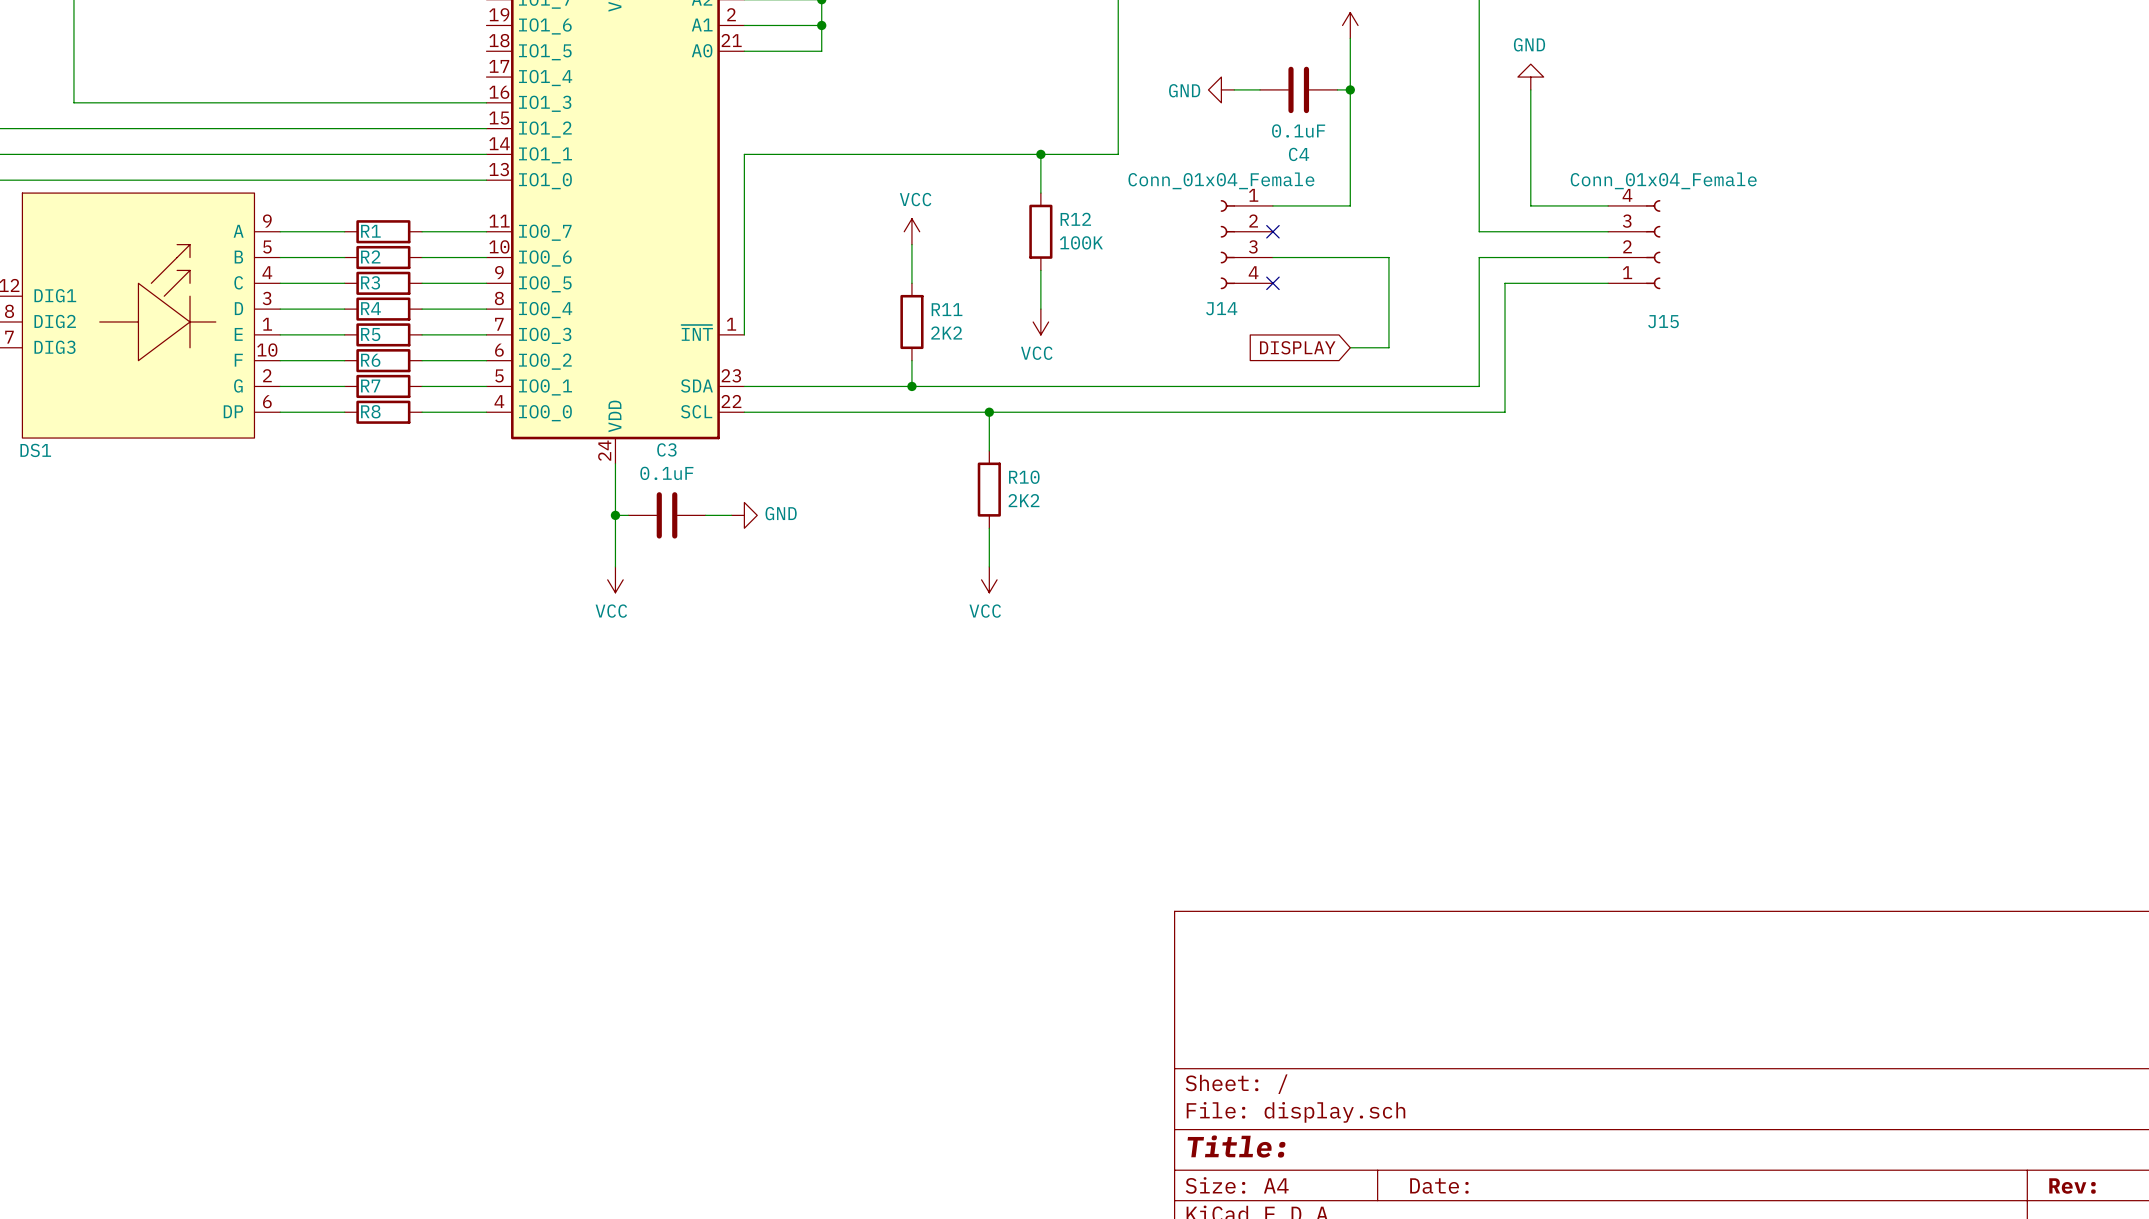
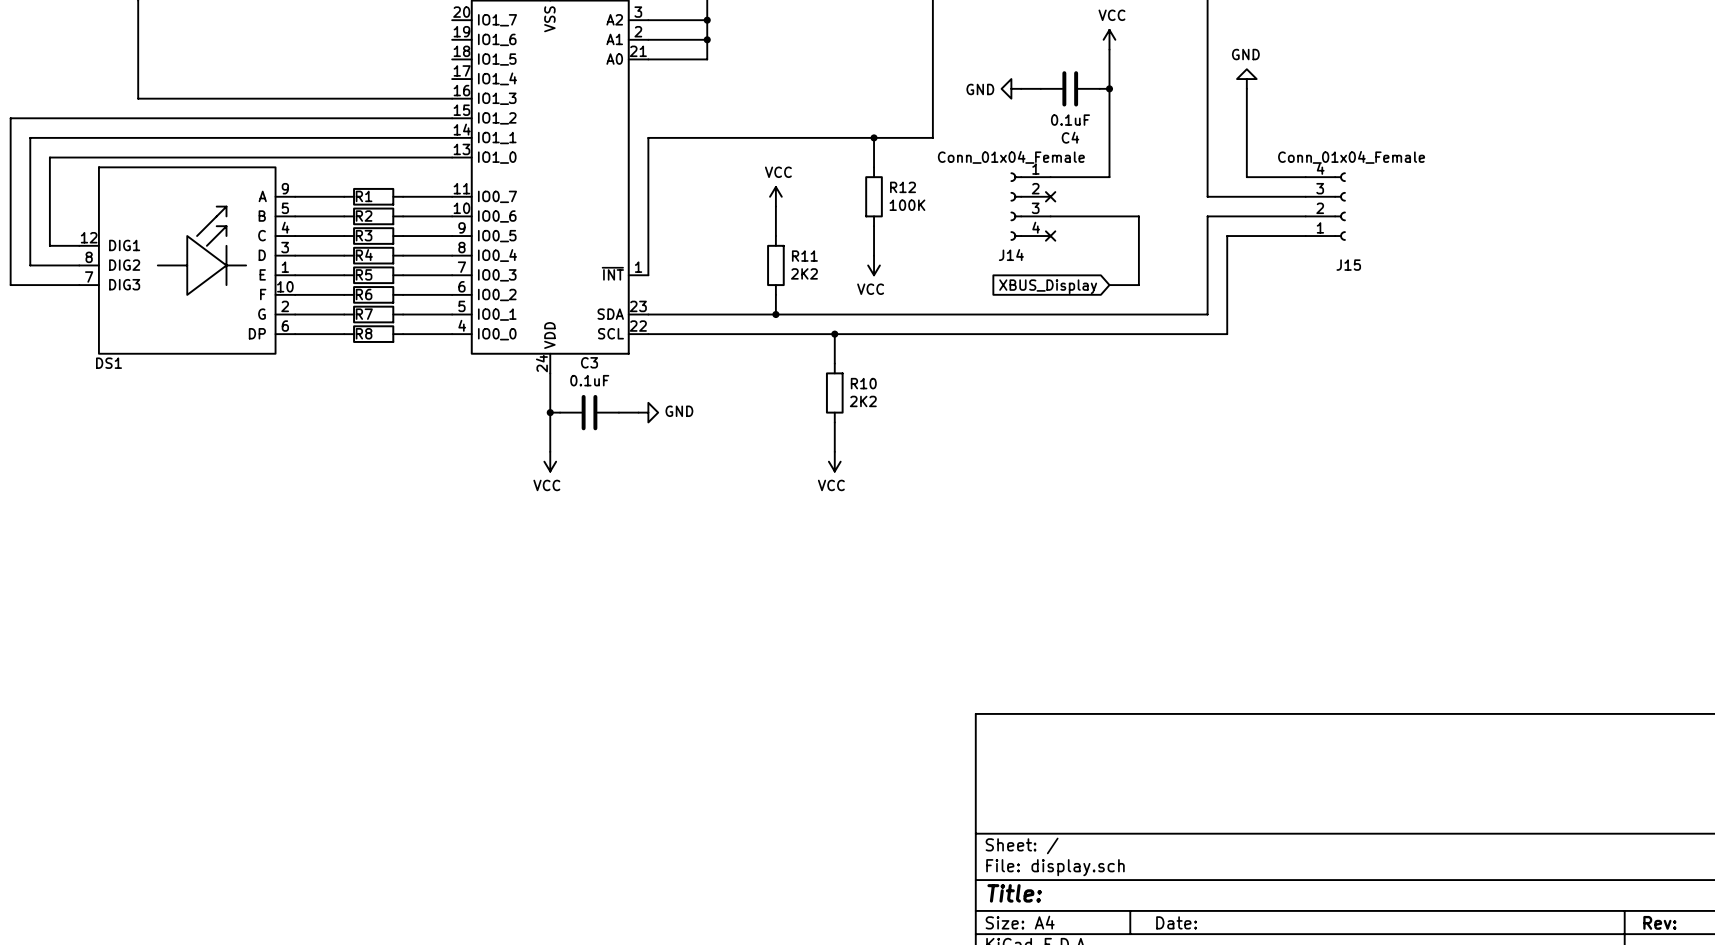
global label: DISPLAY (1297, 347) -> XBUS_Display (1048, 286)

